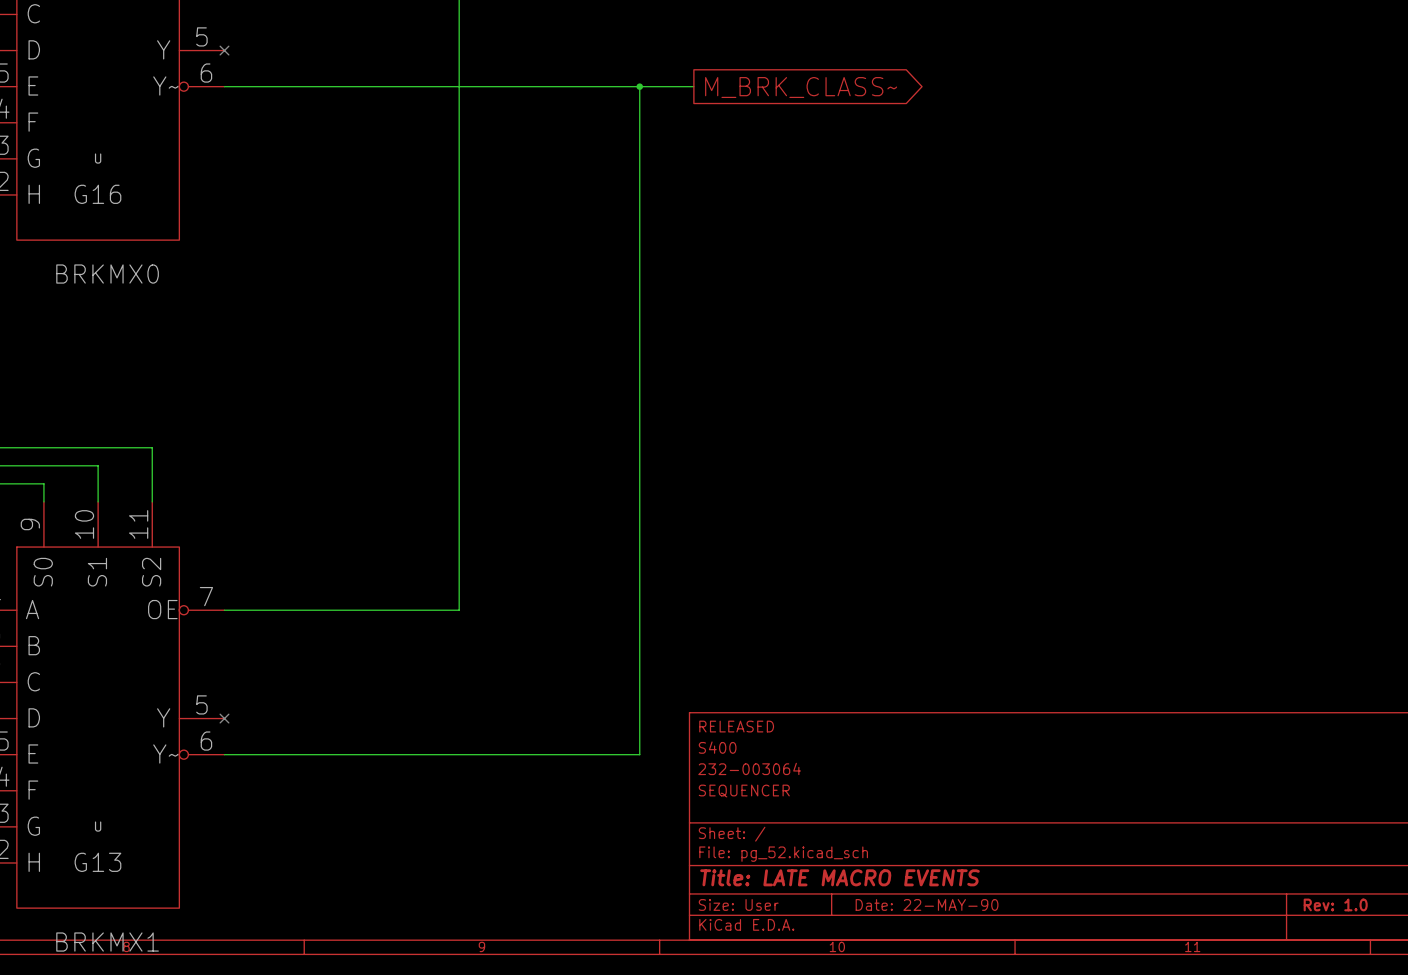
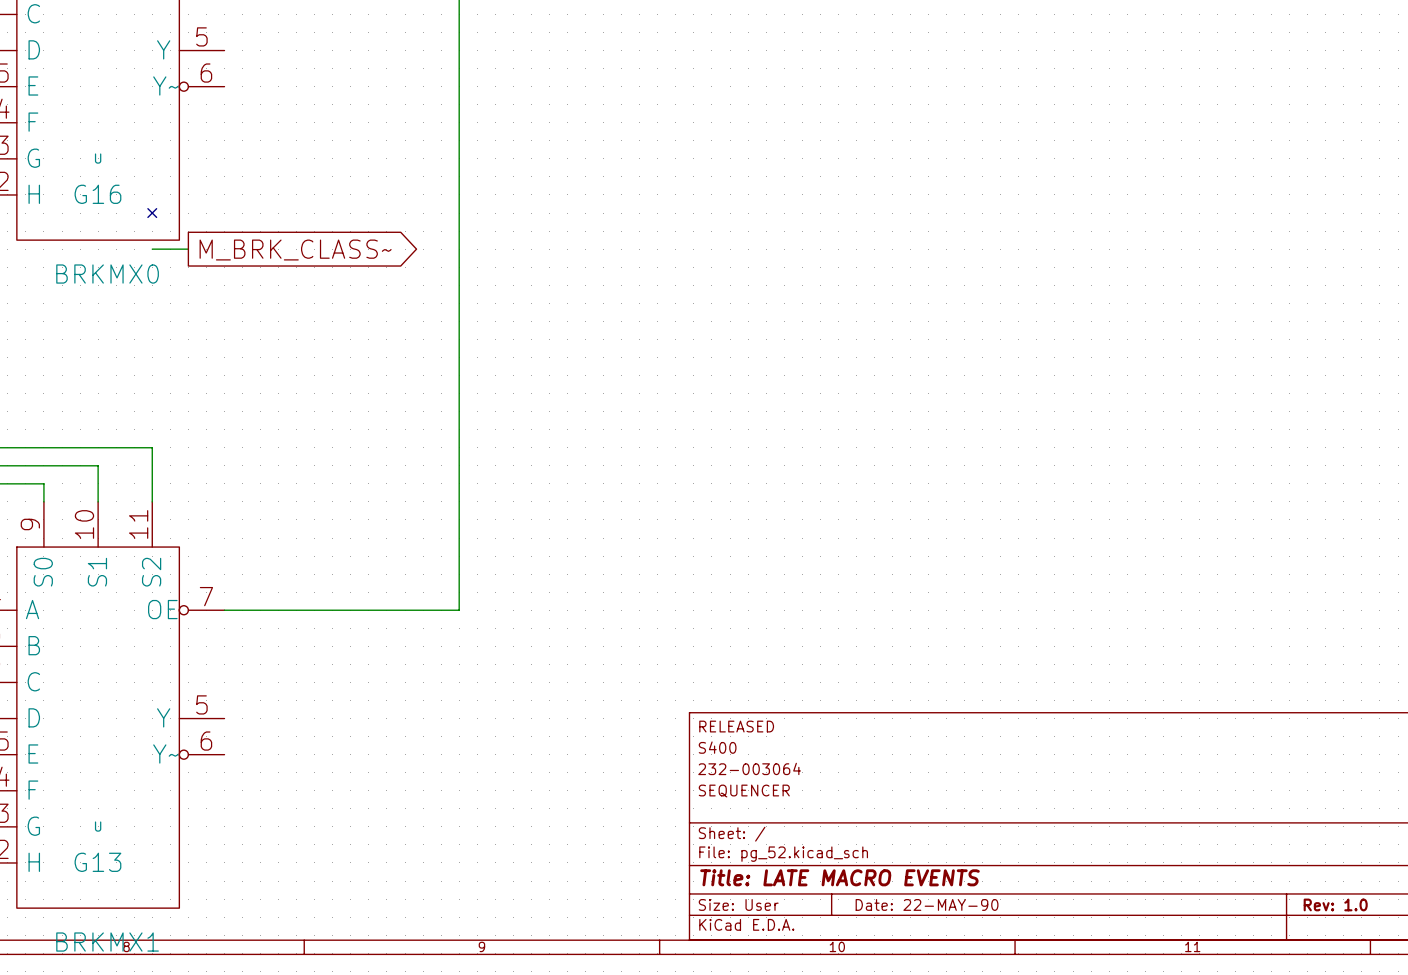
no-connect mark: (224, 50) -> none
wire: (224, 86) (693, 86) -> none
wire: (639, 86) (639, 754) (224, 754) -> none
junction: (639, 86) -> none
global label: M_BRK_CLASS~ (801, 87) -> none
no-connect mark: none -> (152, 213)
wire: none -> (152, 249) (188, 249)
global label: none -> M_BRK_CLASS~ (295, 250)
no-connect mark: (224, 718) -> none

